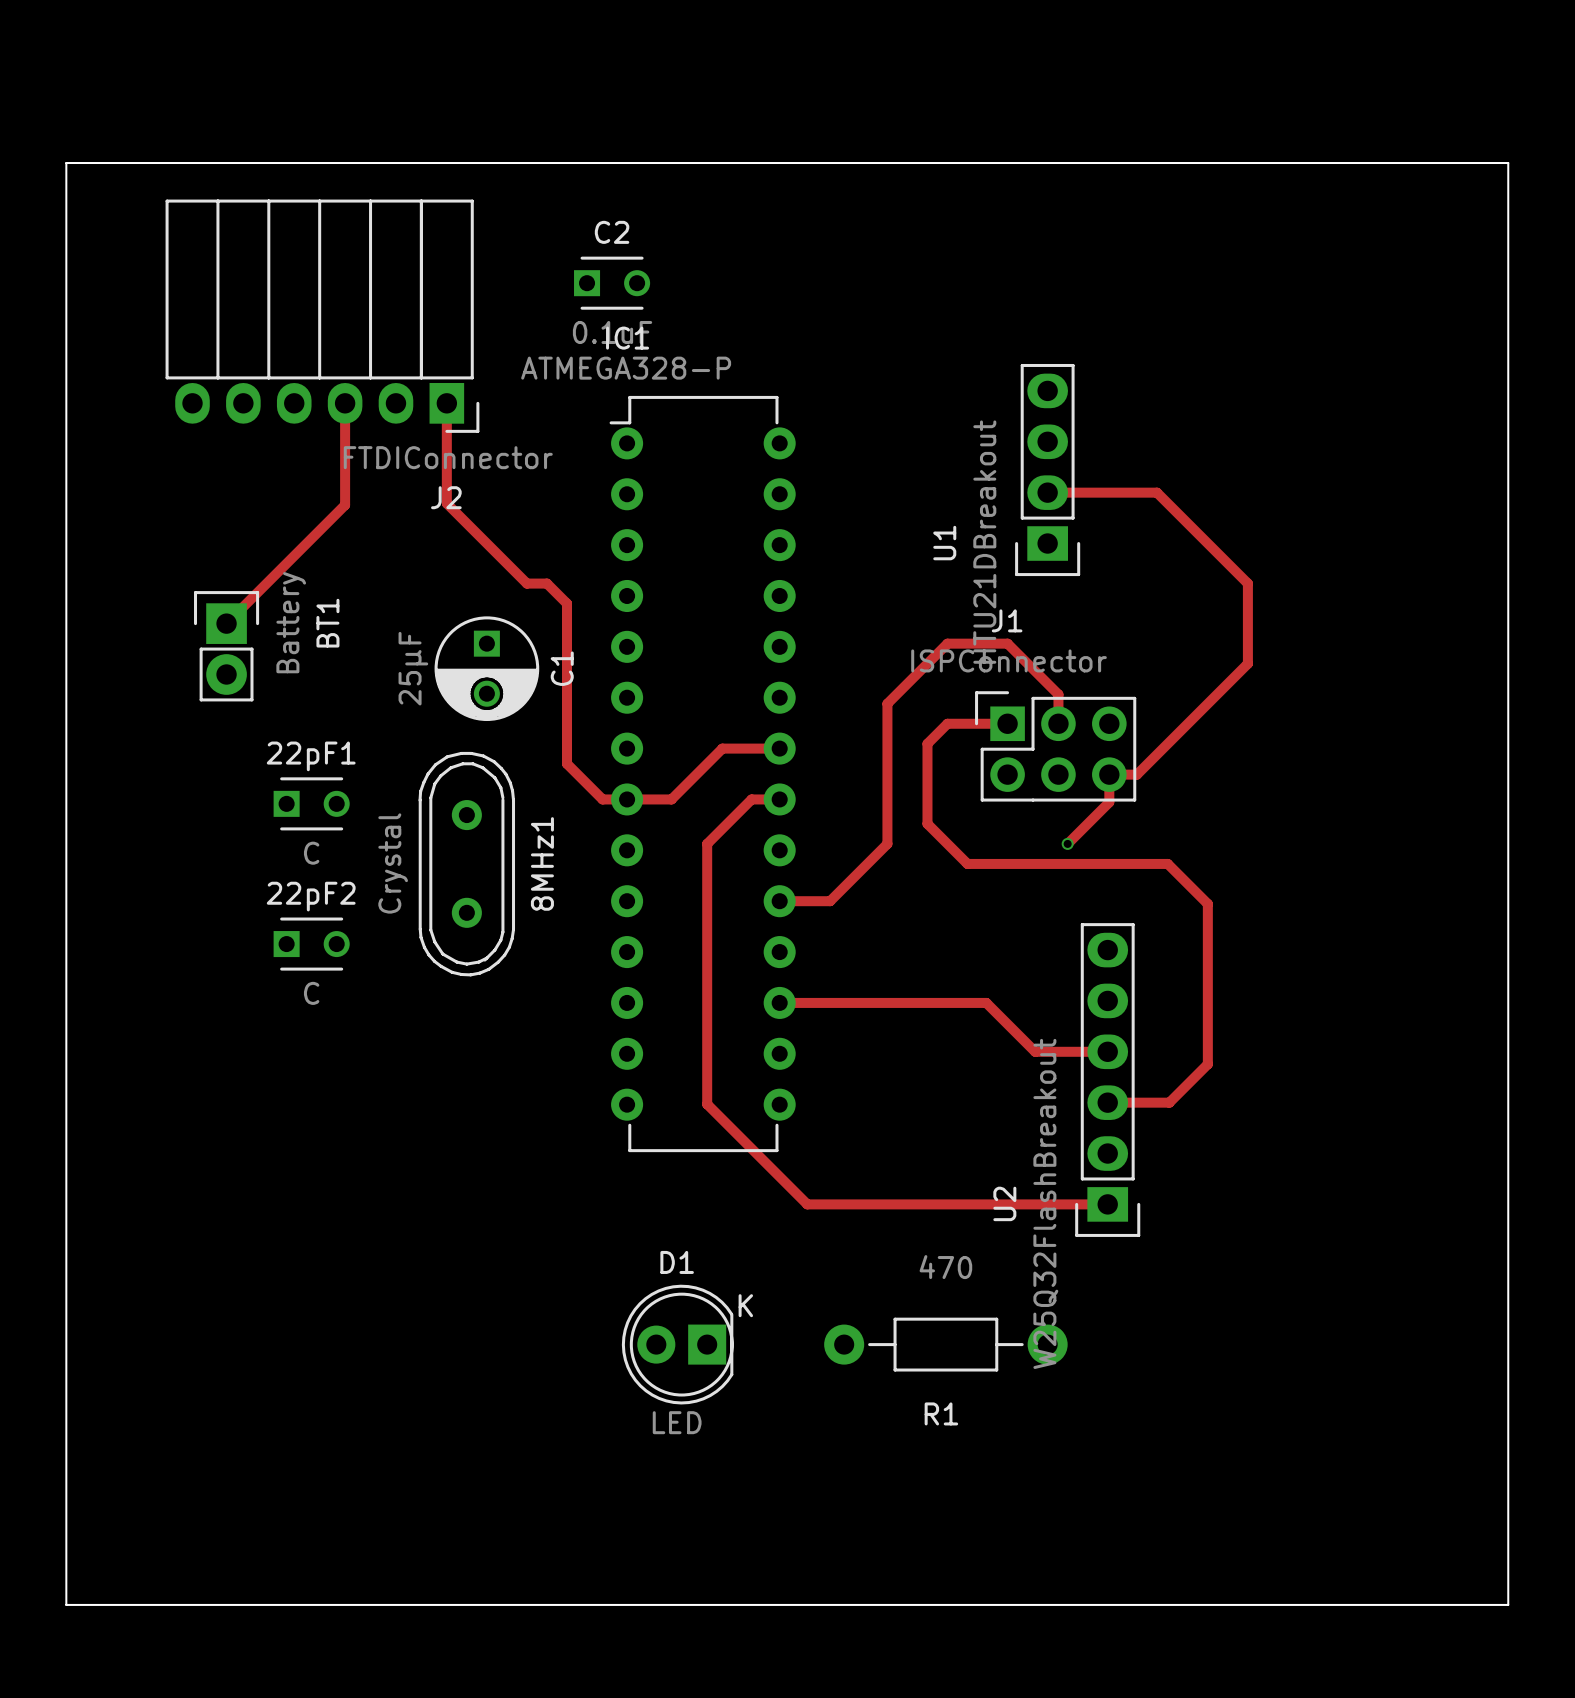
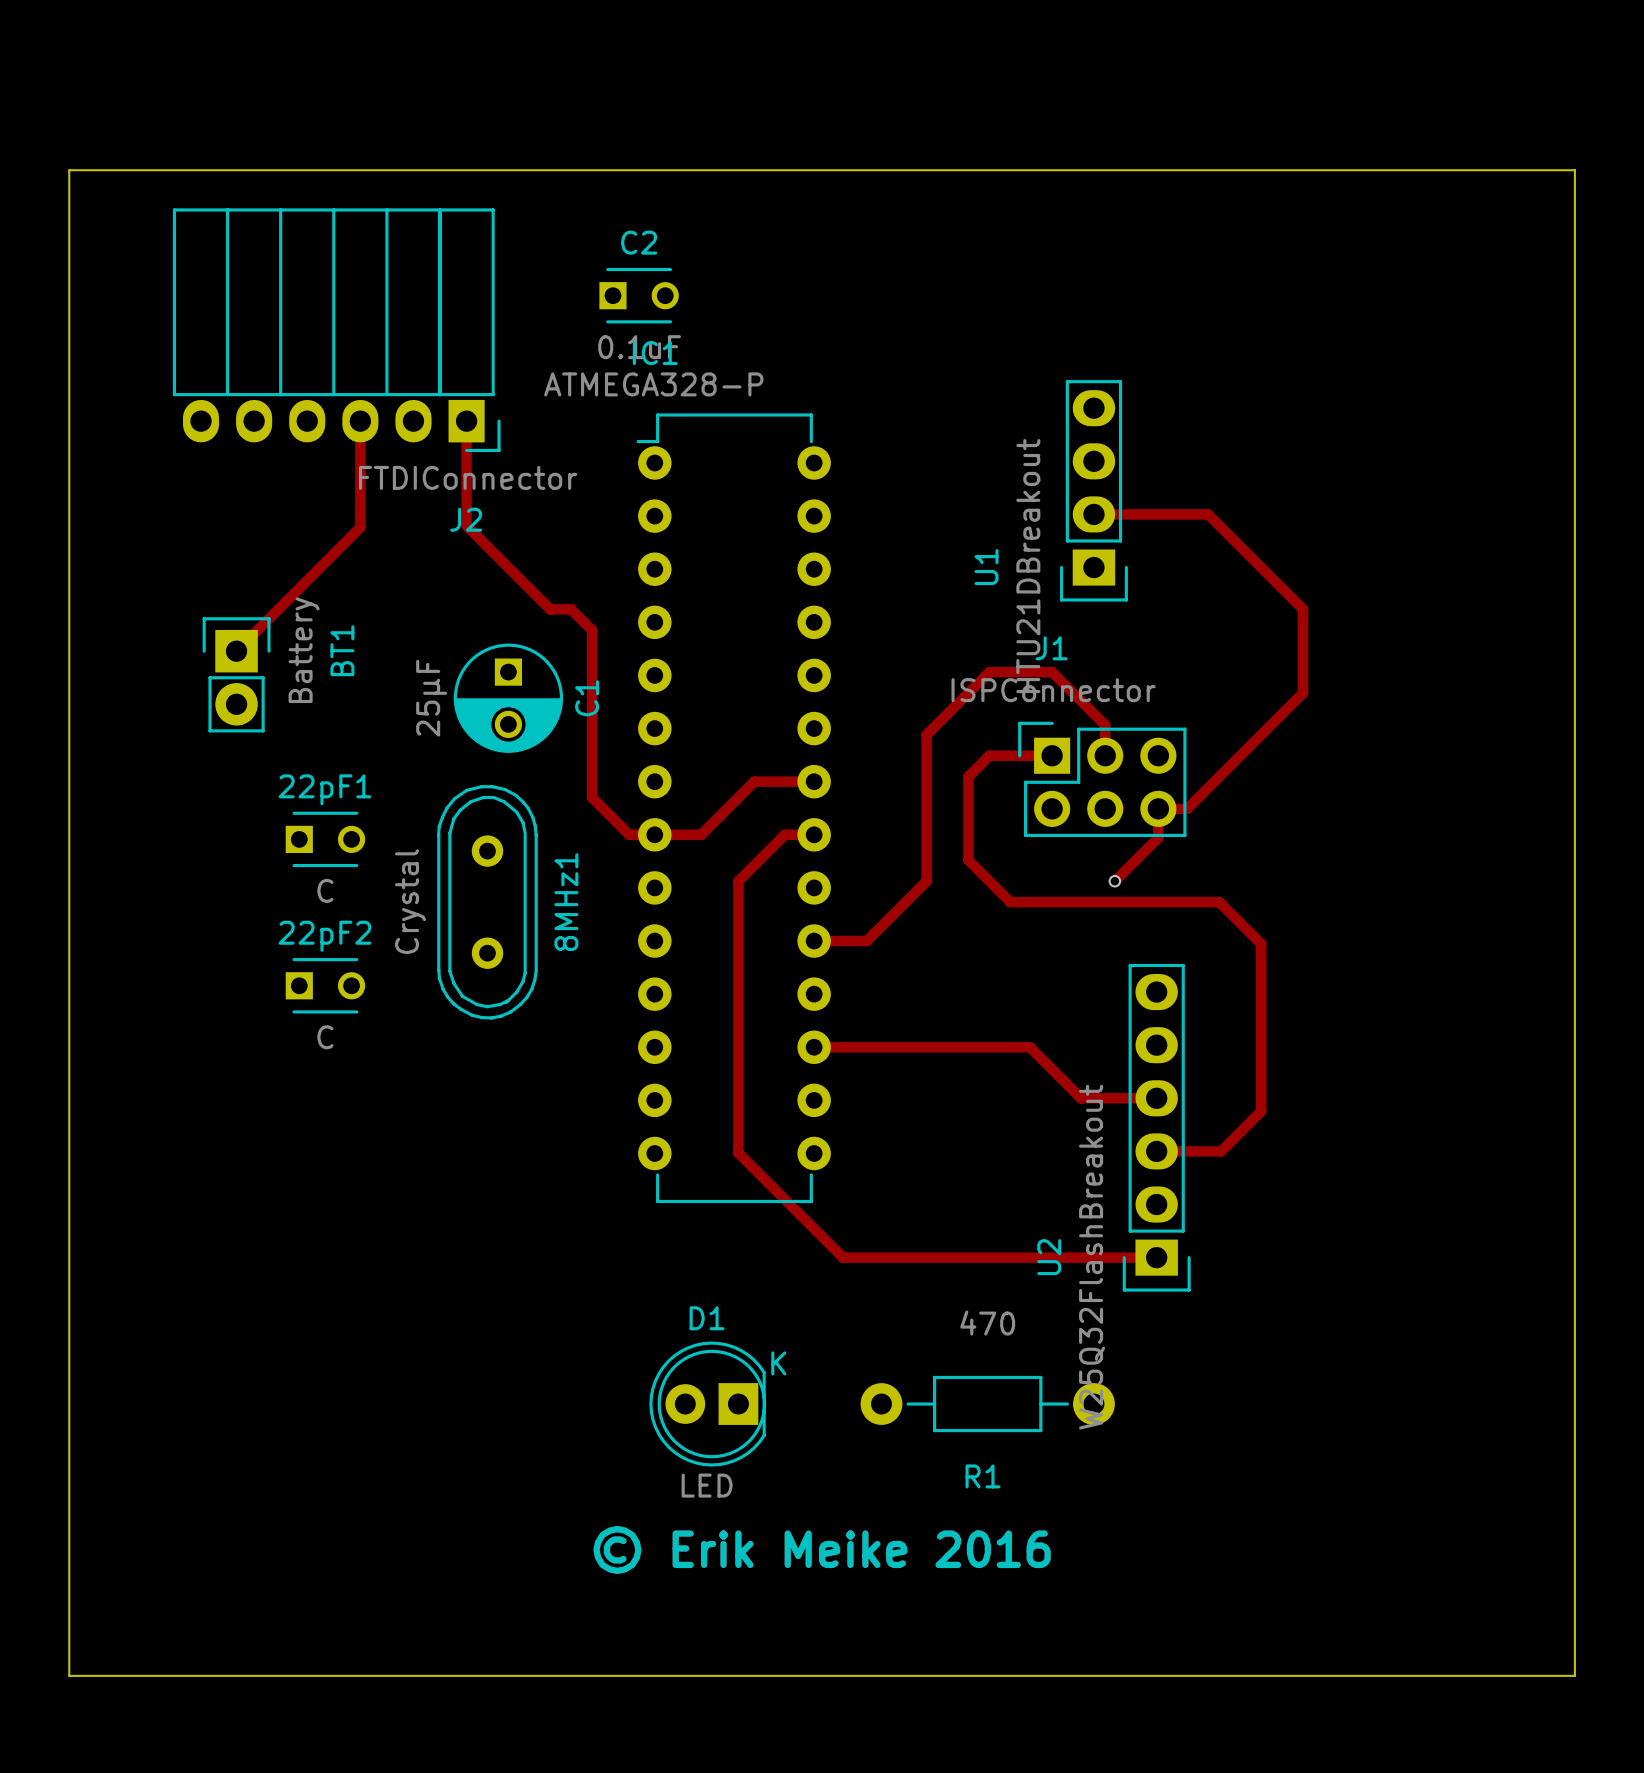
text: none -> © Erik Meike 2016 (822, 1549)

